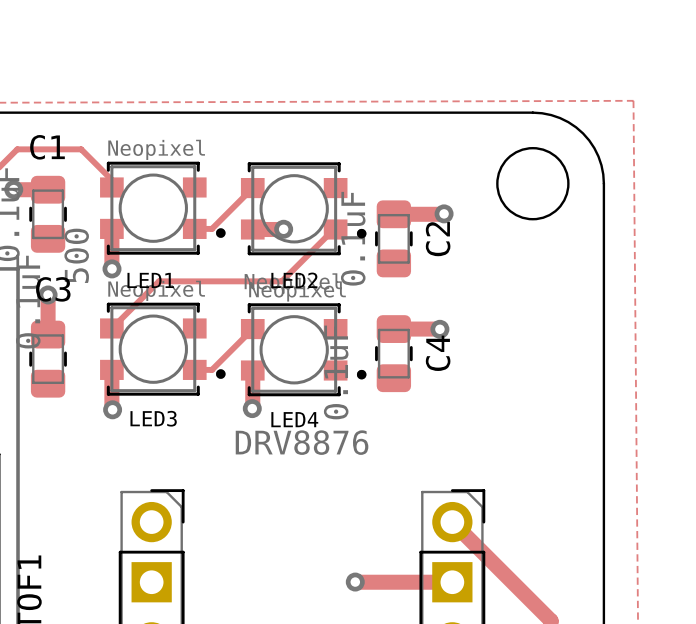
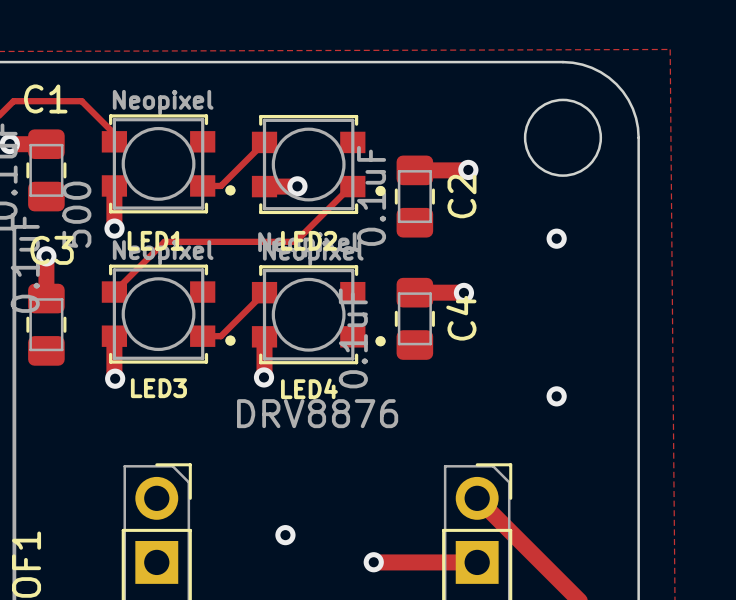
via: none -> (556, 238)
via: none -> (556, 396)
via: none -> (285, 535)

